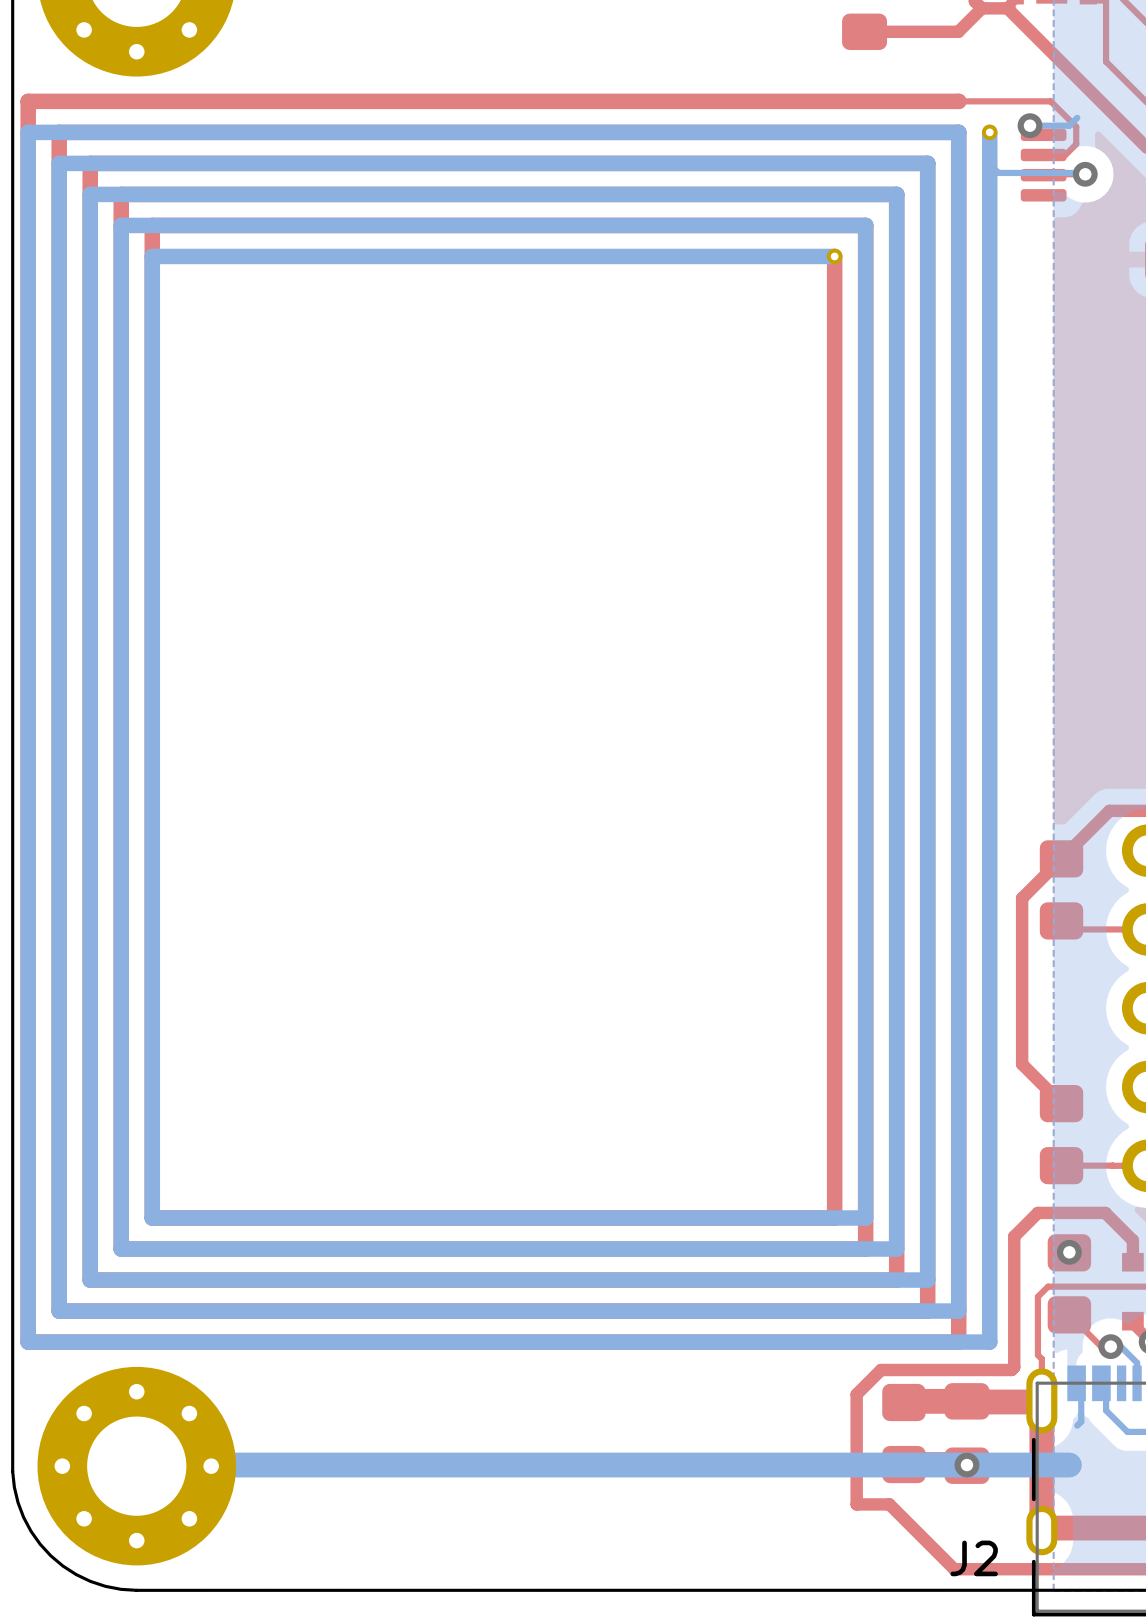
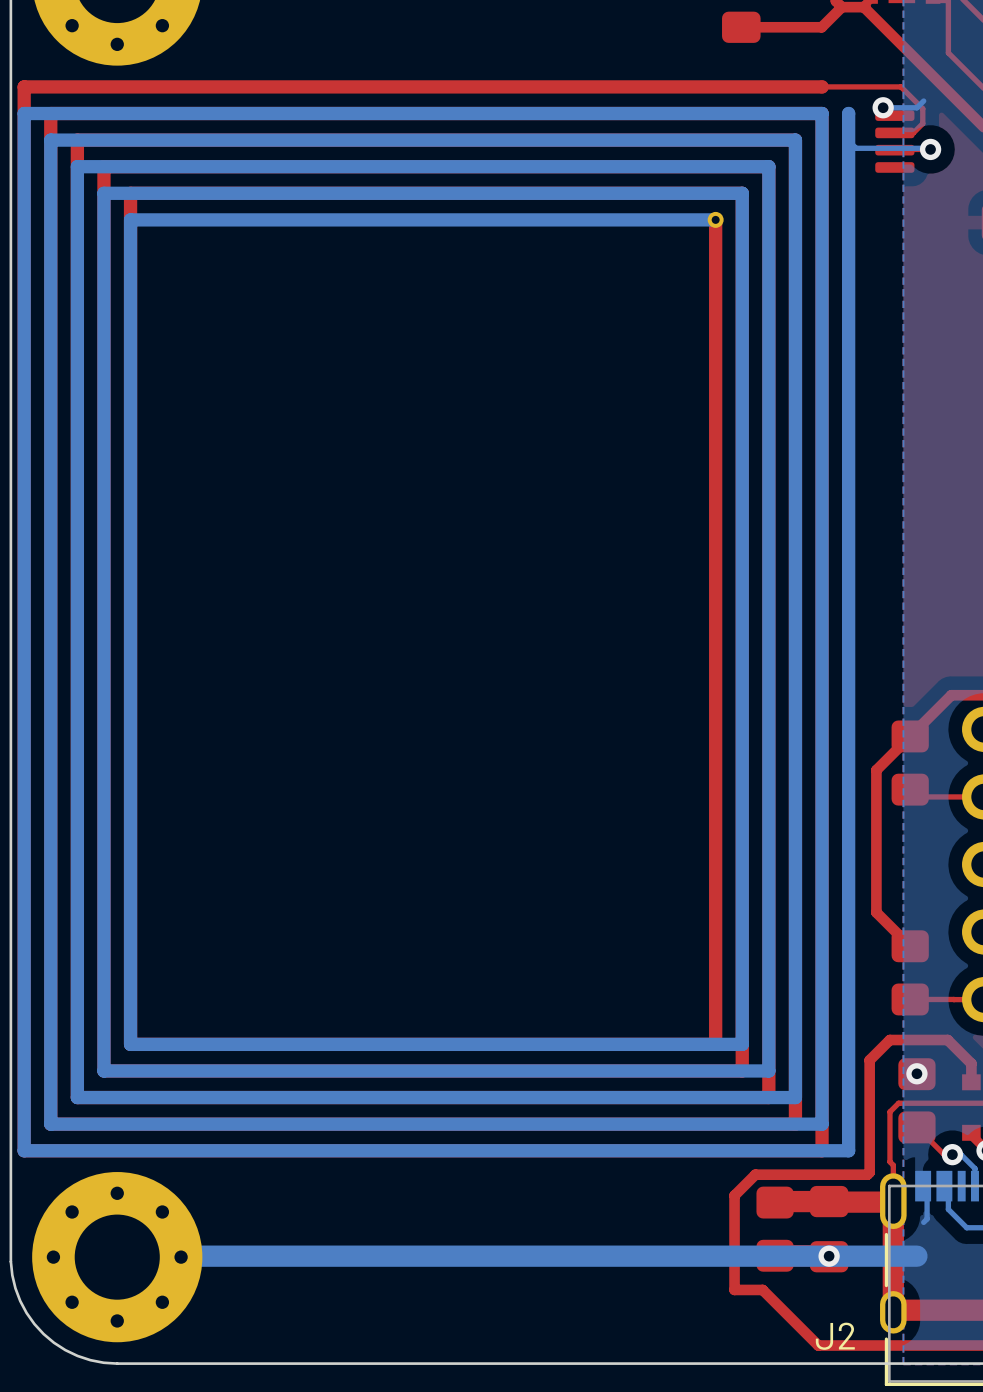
part footprint: [20, 93, 998, 1350] -> [17, 80, 856, 1158]

